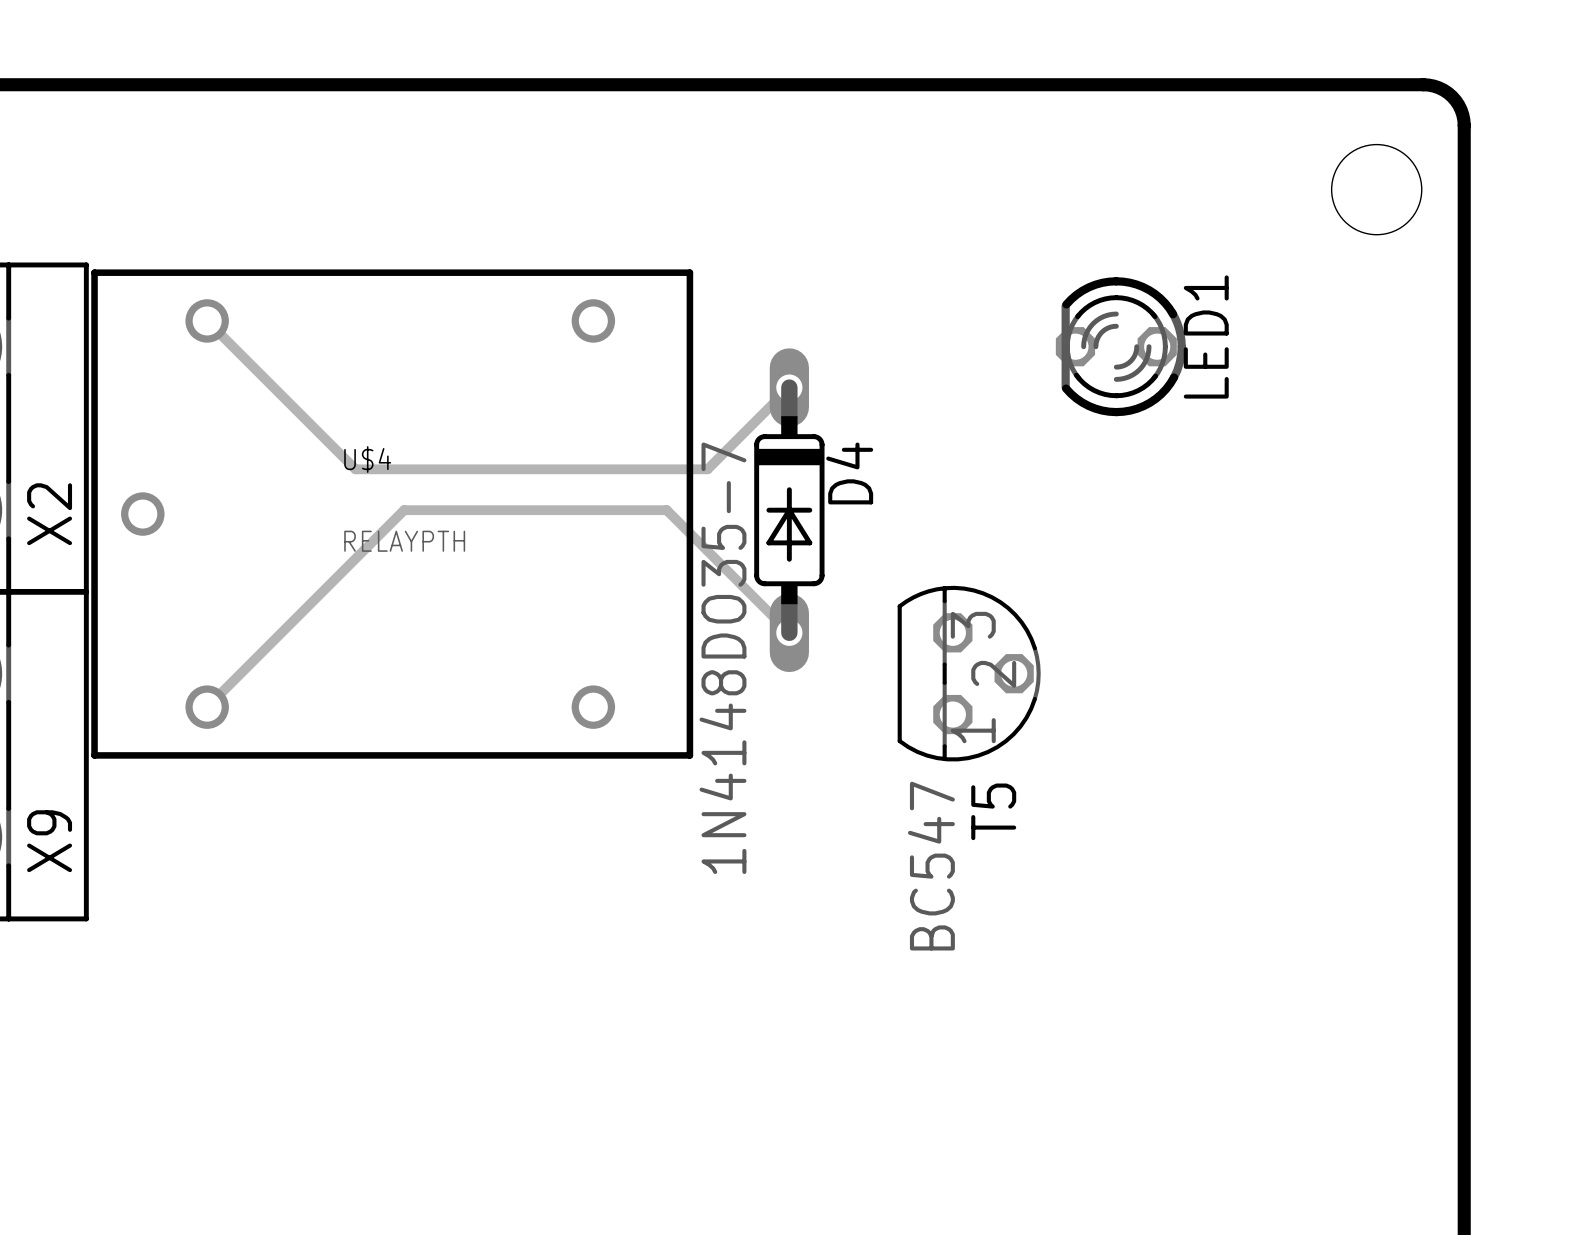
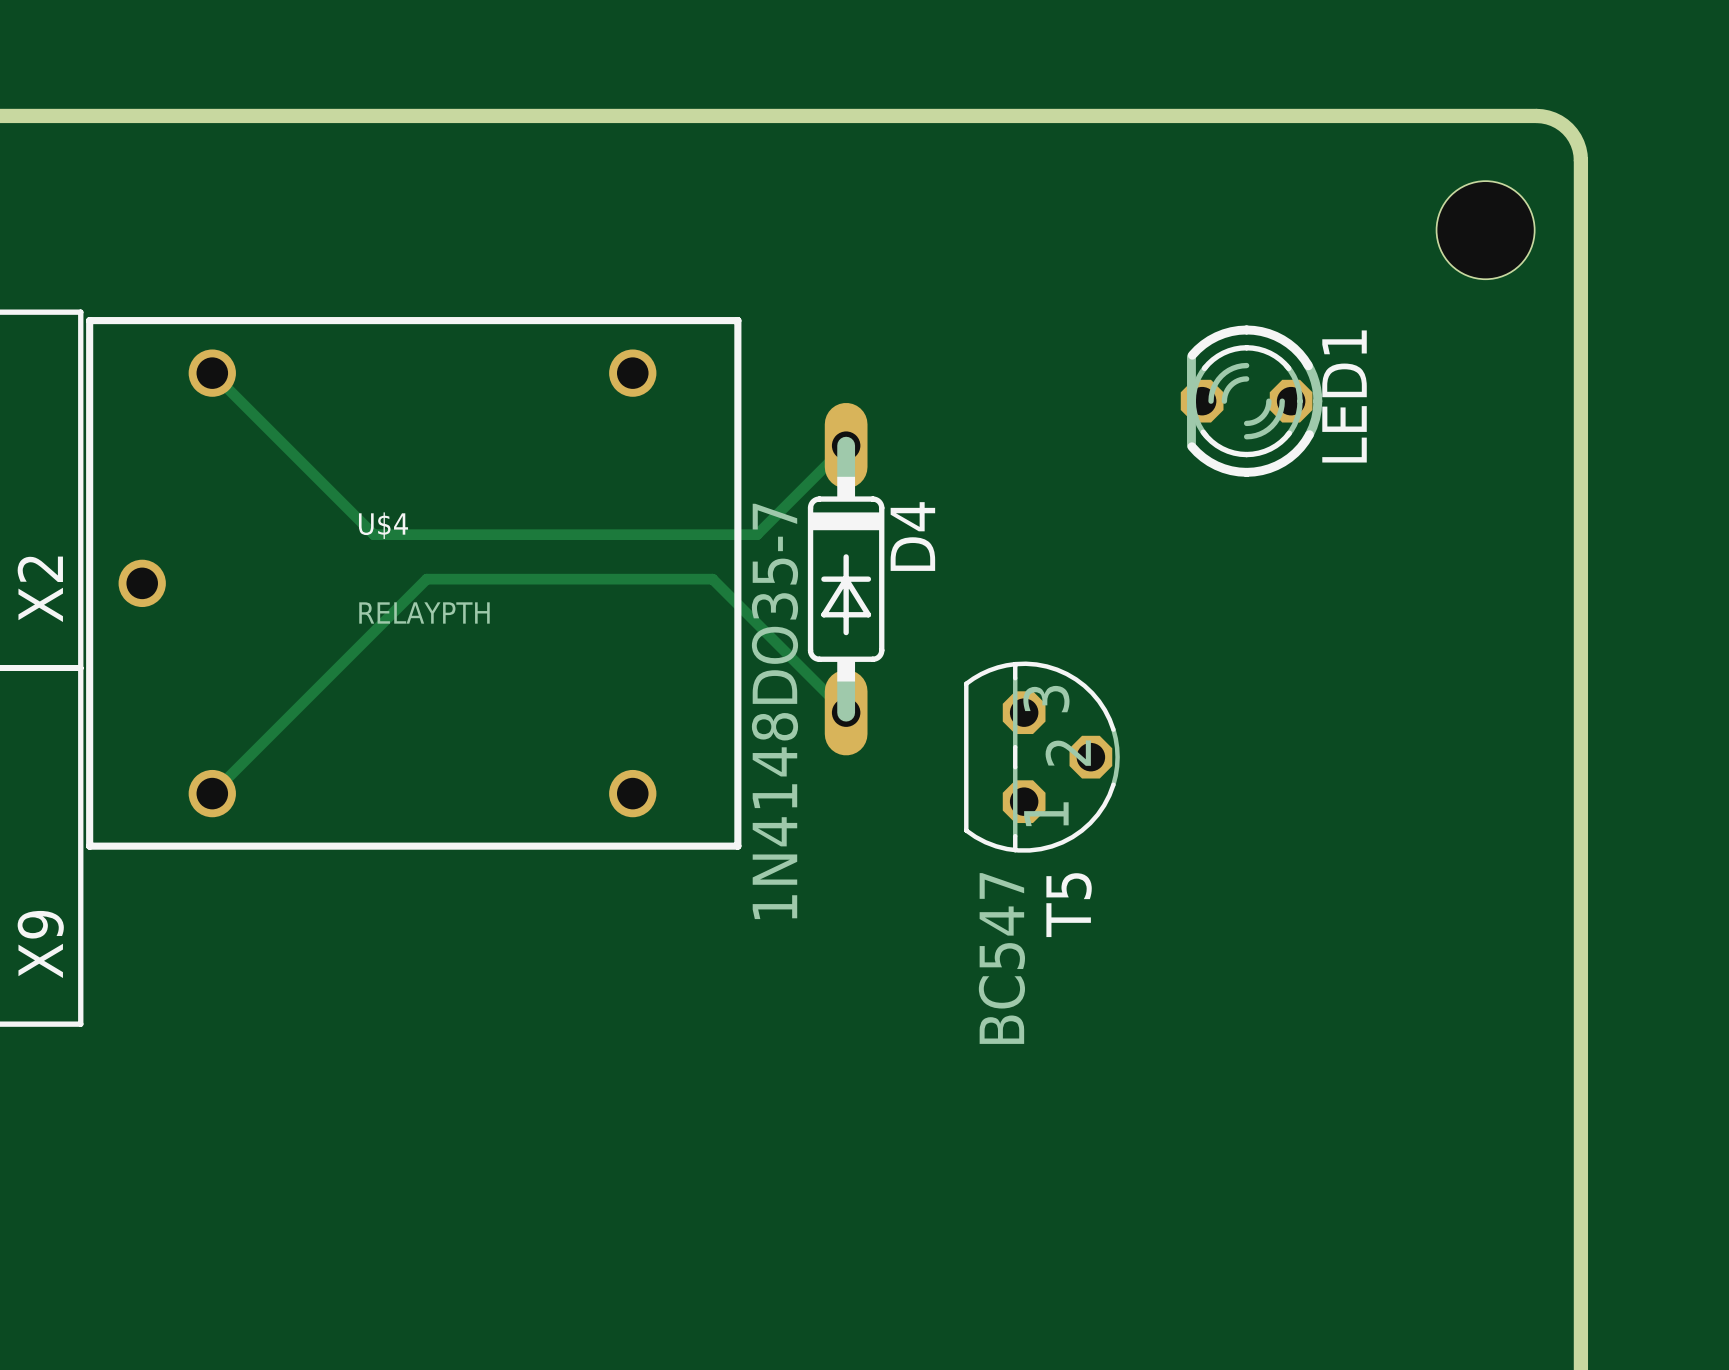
LED1 position: (1120, 346) -> (1251, 401)

